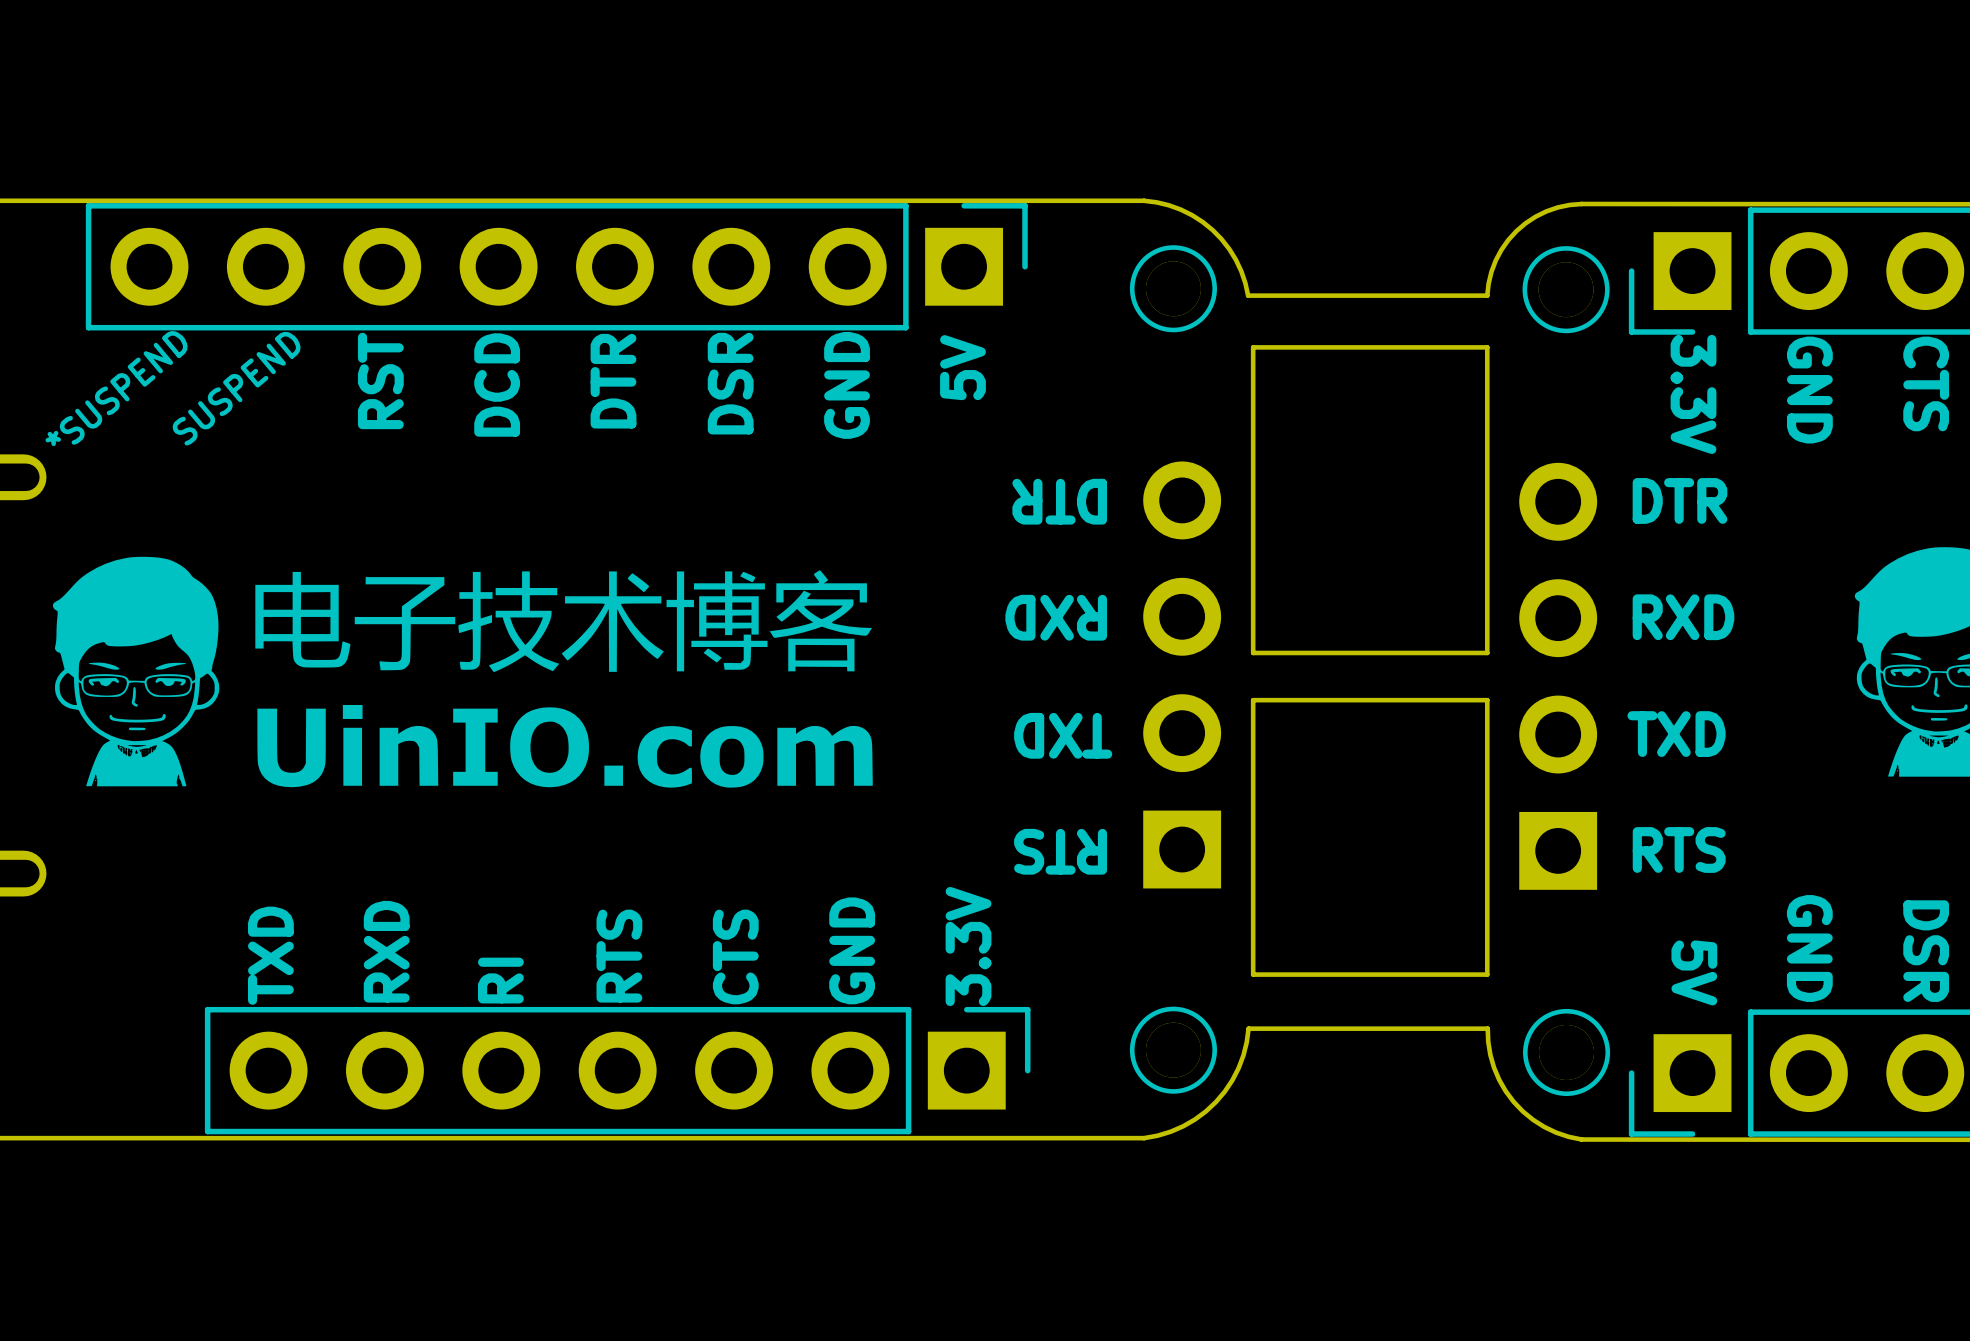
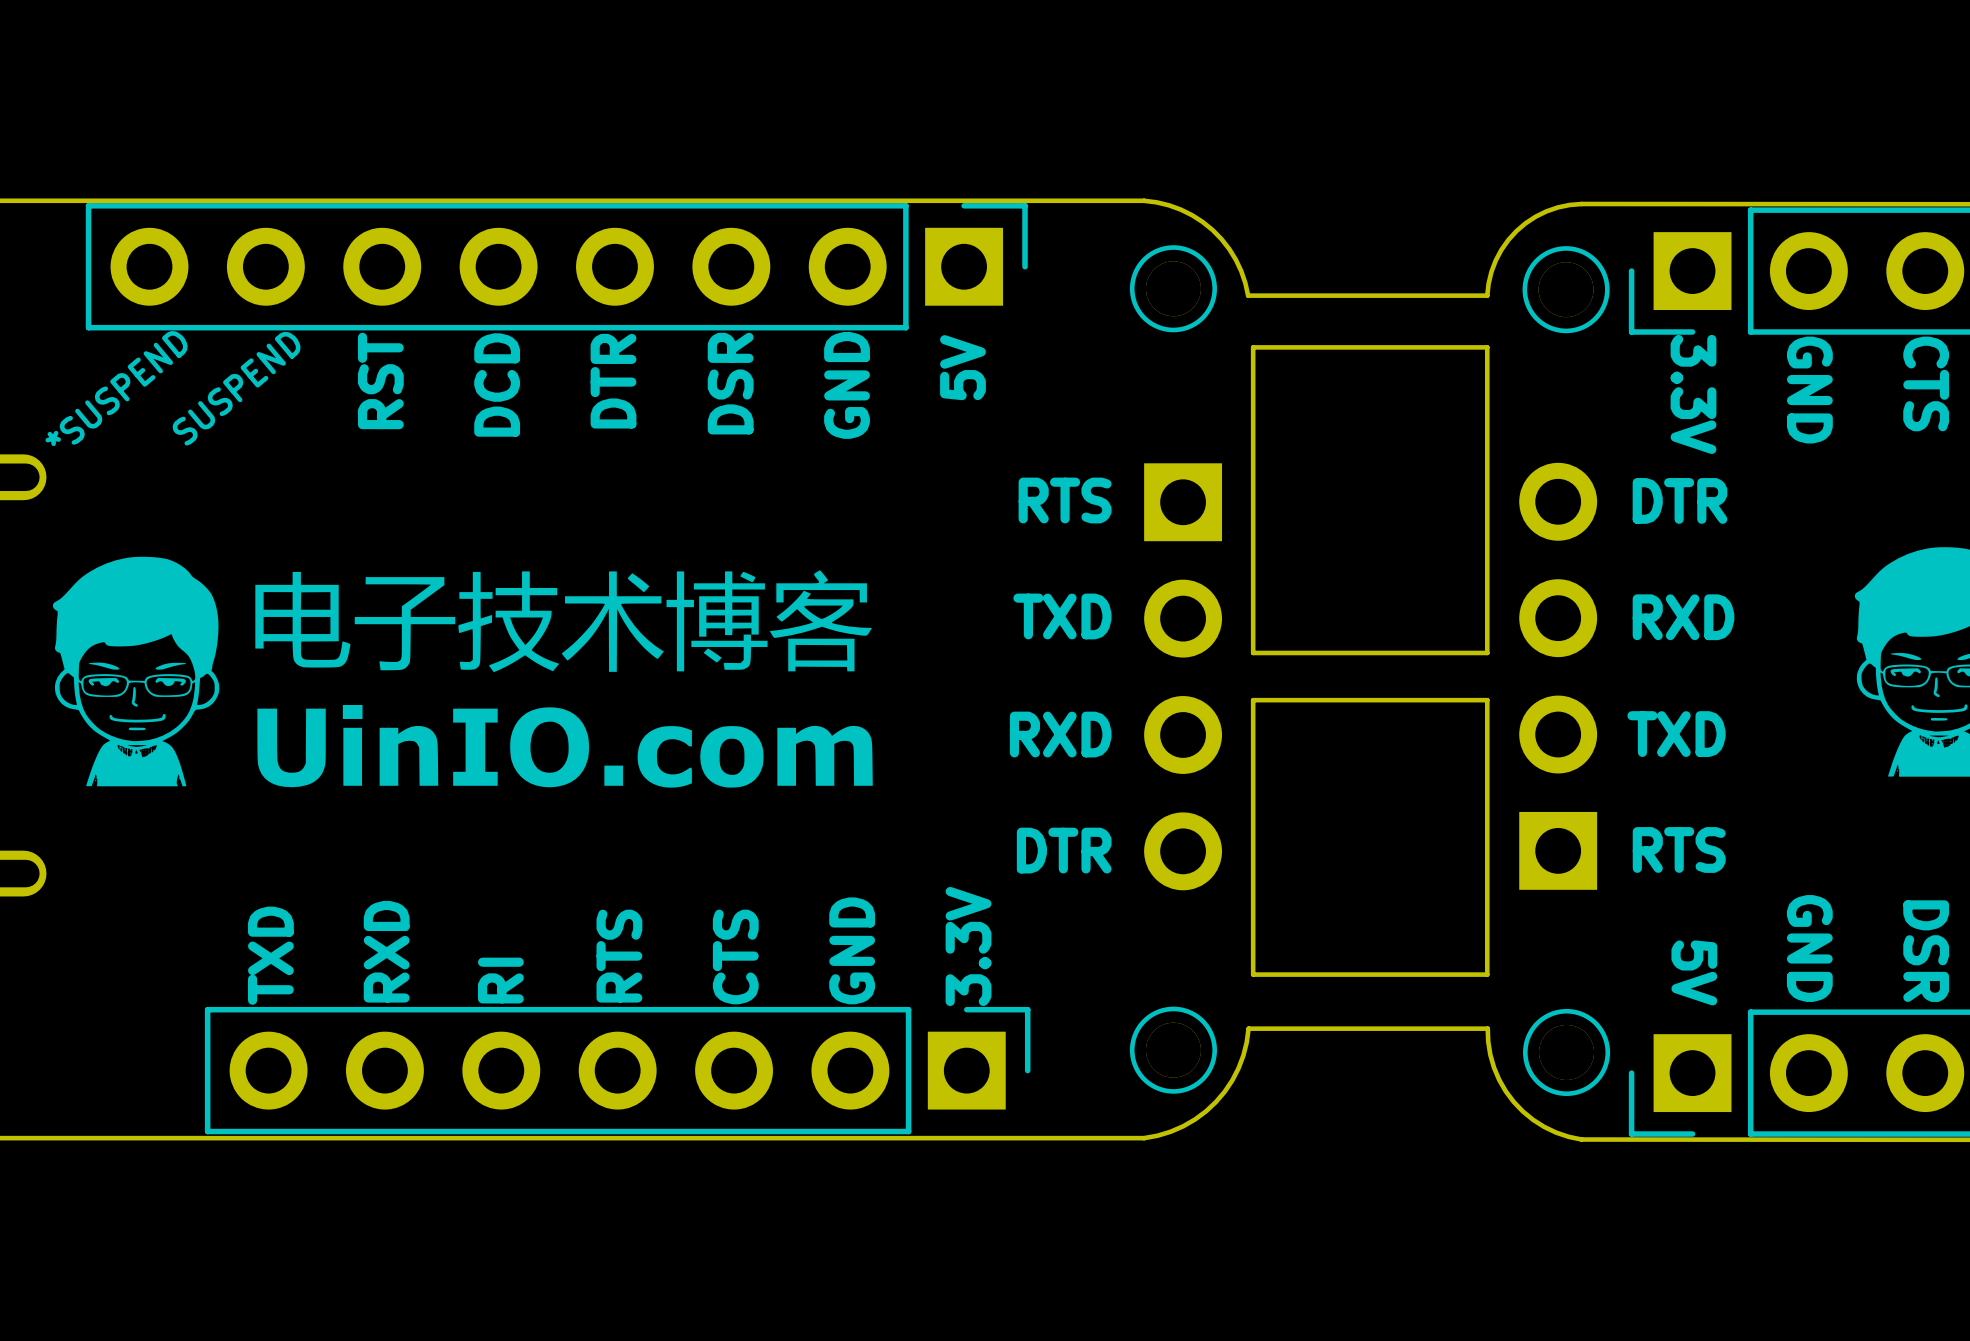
text: DTR (1059, 501) -> RTS (1065, 500)
text: RXD (1056, 617) -> TXD (1062, 616)
part rotation: 0° (1182, 674) -> 180° (1183, 676)
text: TXD (1063, 735) -> RXD (1060, 734)
text: RTS (1060, 851) -> DTR (1064, 850)

